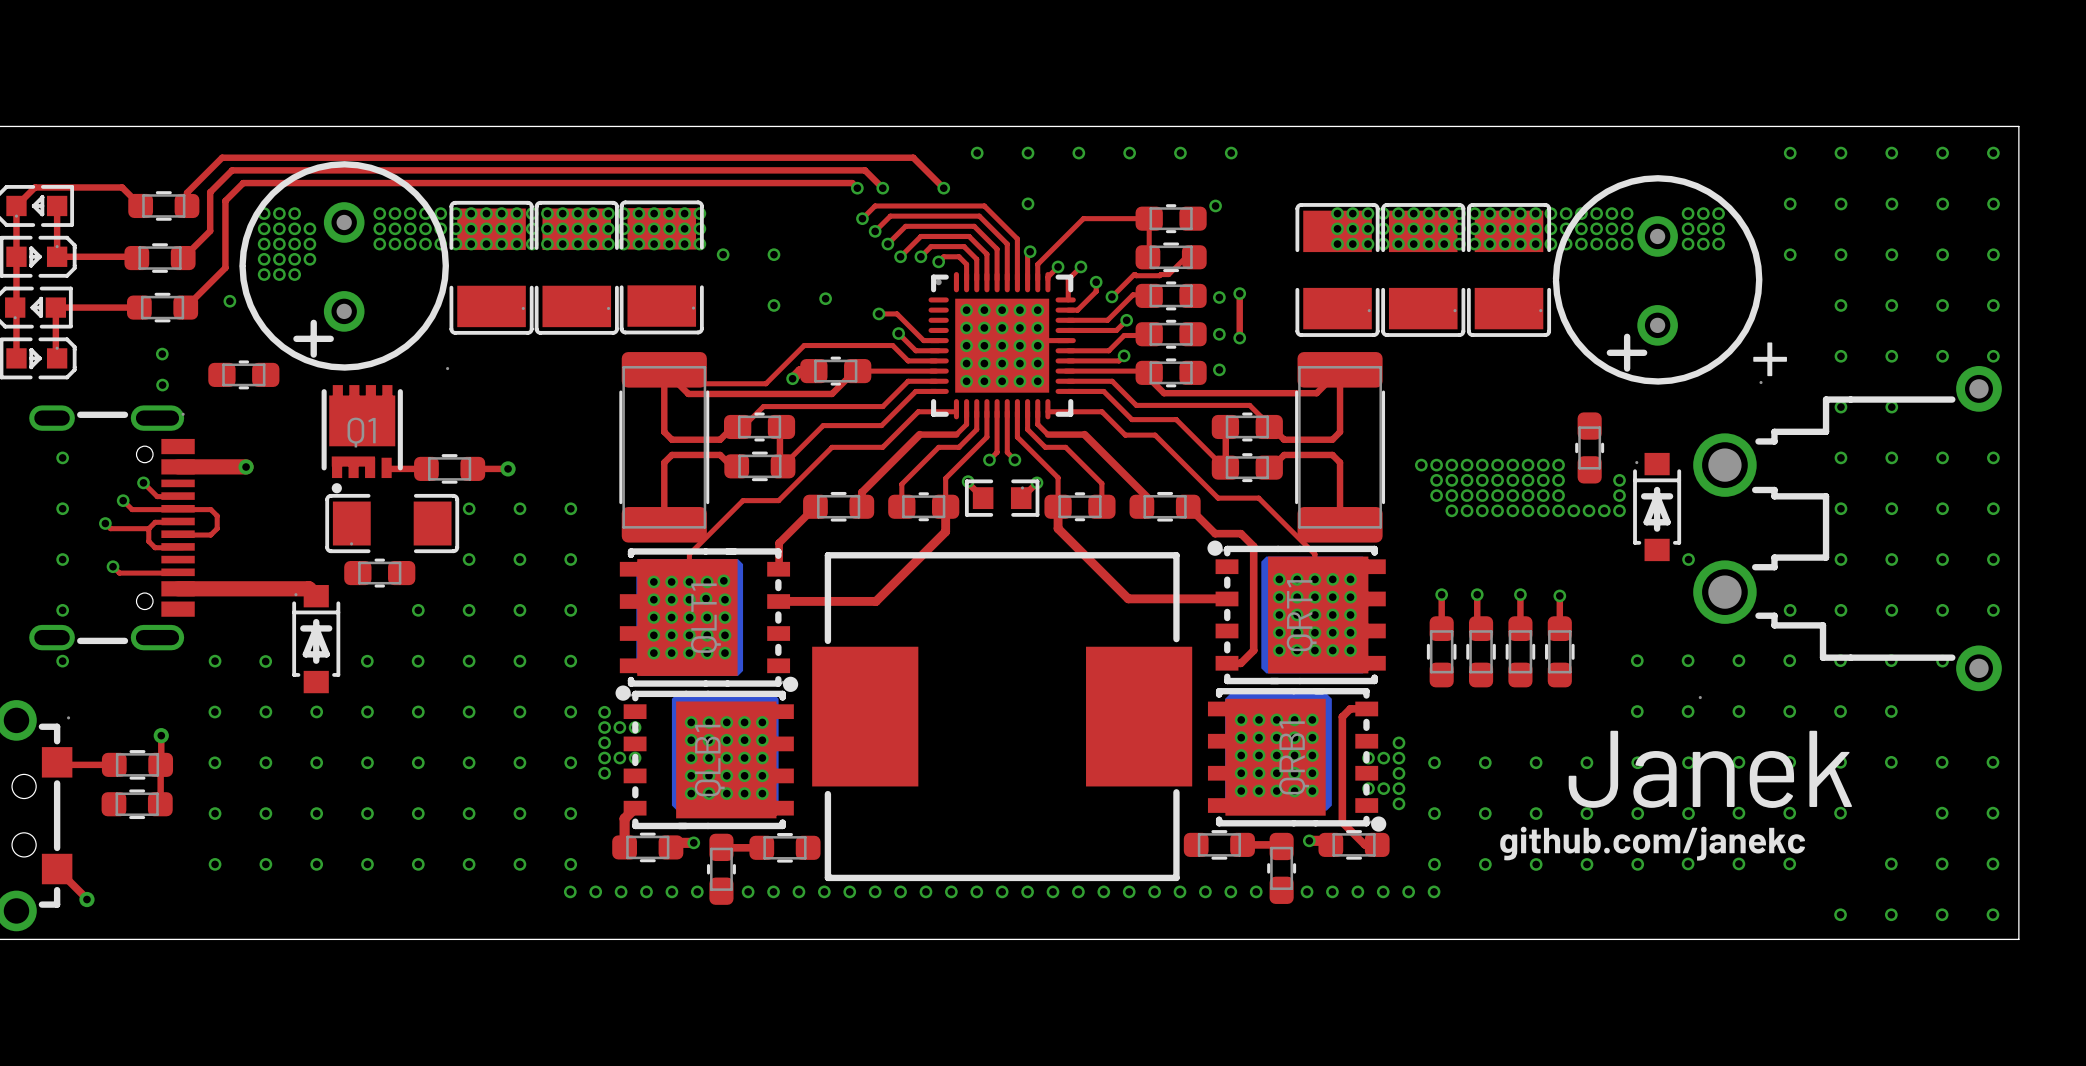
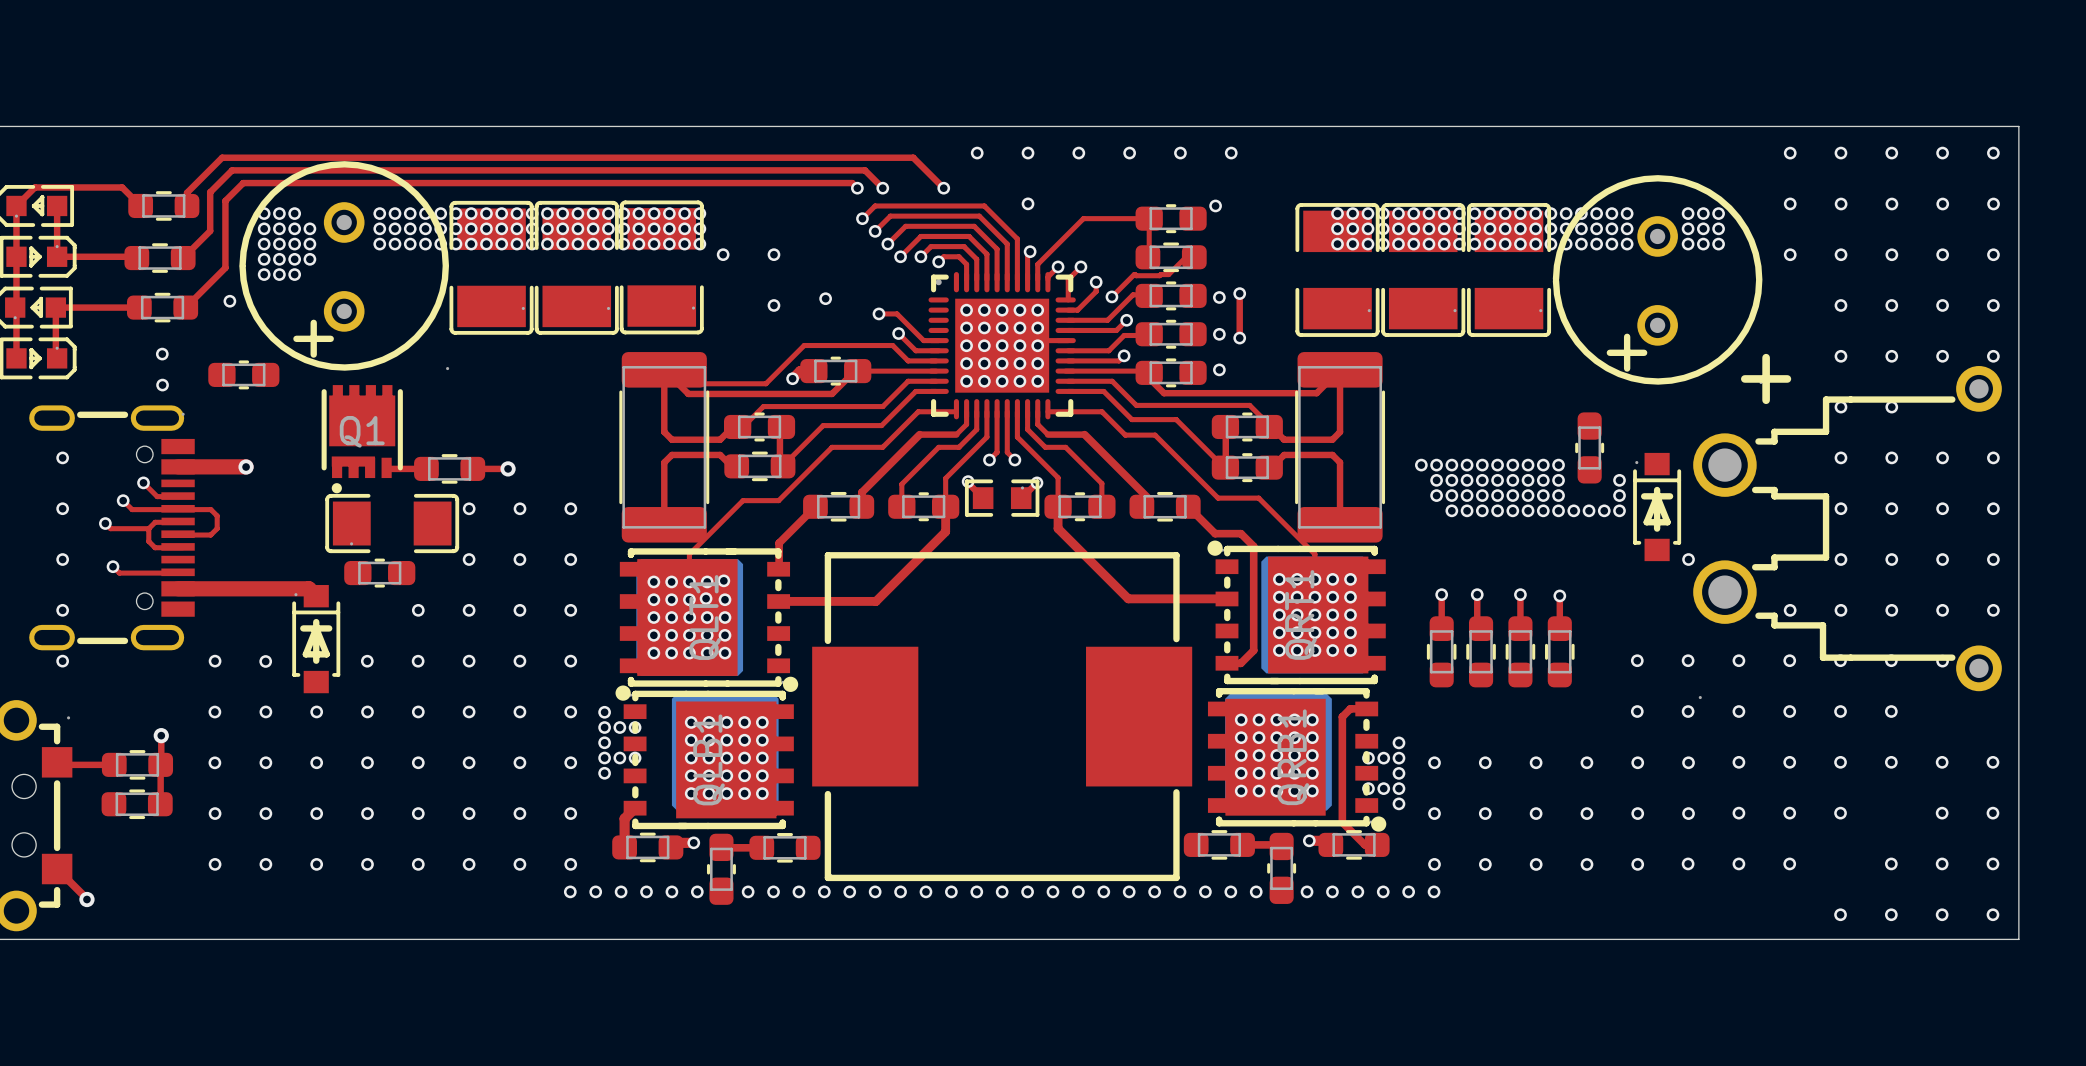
text: Janek (1710, 769) -> none
text: github.com/janekc (1652, 843) -> none

